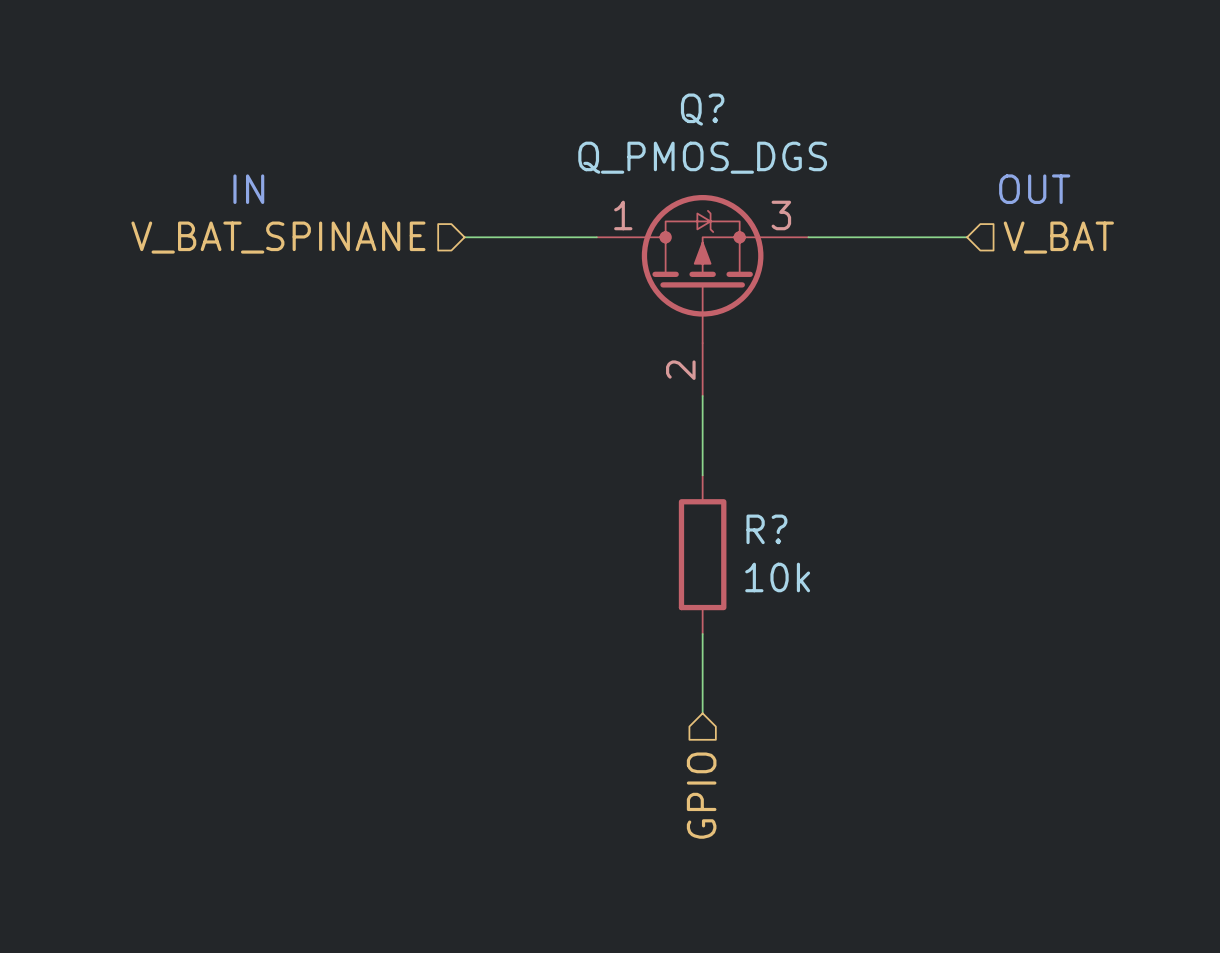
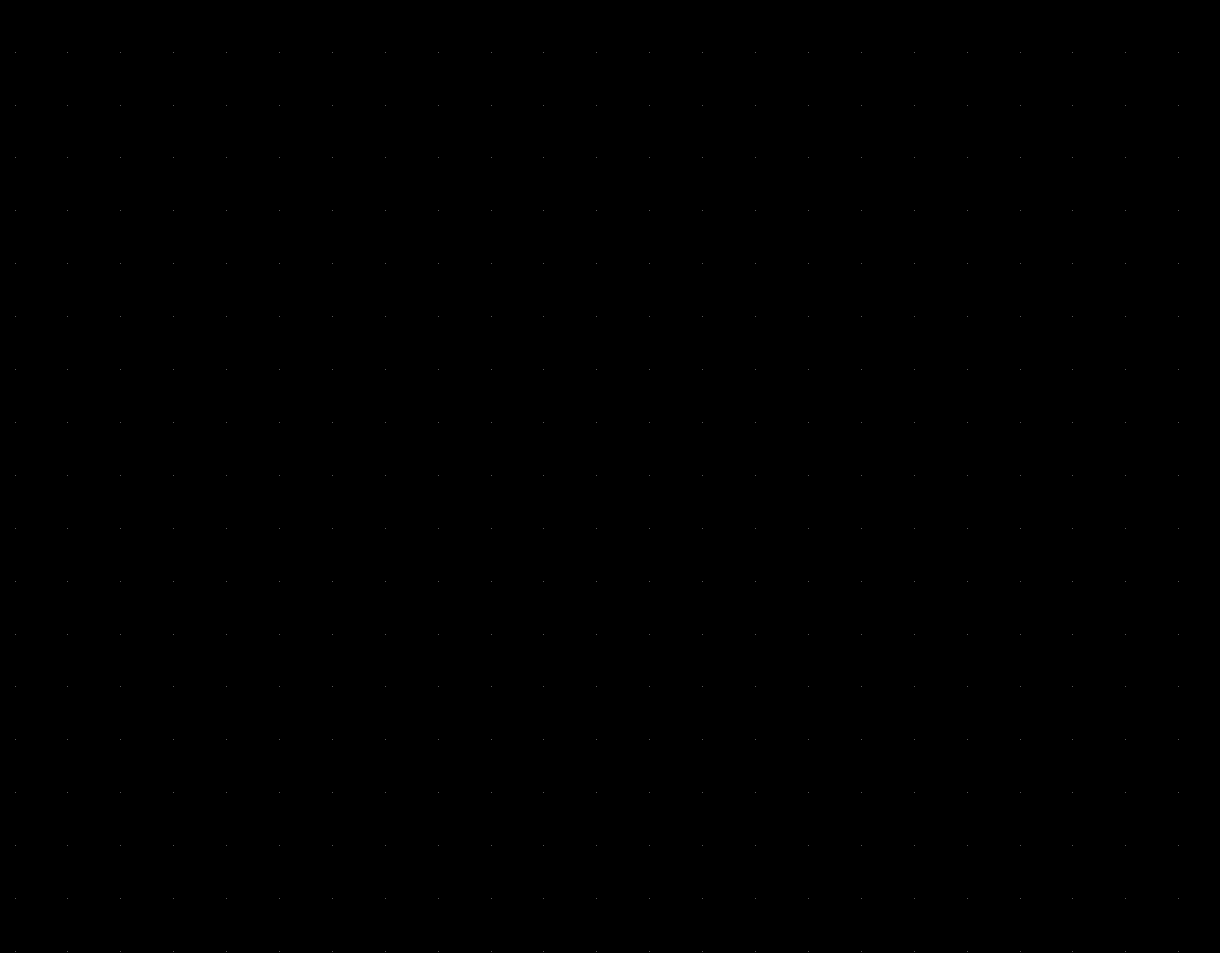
text: IN (248, 189) -> none
text: OUT (1034, 189) -> none
hierarchical label: V_BAT_SPINANE (278, 237) -> none
wire: (464, 237) (596, 237) -> none
wire: (808, 237) (967, 237) -> none
hierarchical label: V_BAT (1058, 237) -> none
Q?: Q_PMOS_DGS (702, 295) -> none
wire: (702, 395) (702, 475) -> none
R?: 10k (702, 554) -> none
wire: (702, 634) (702, 713) -> none
hierarchical label: GPIO (701, 795) -> none

